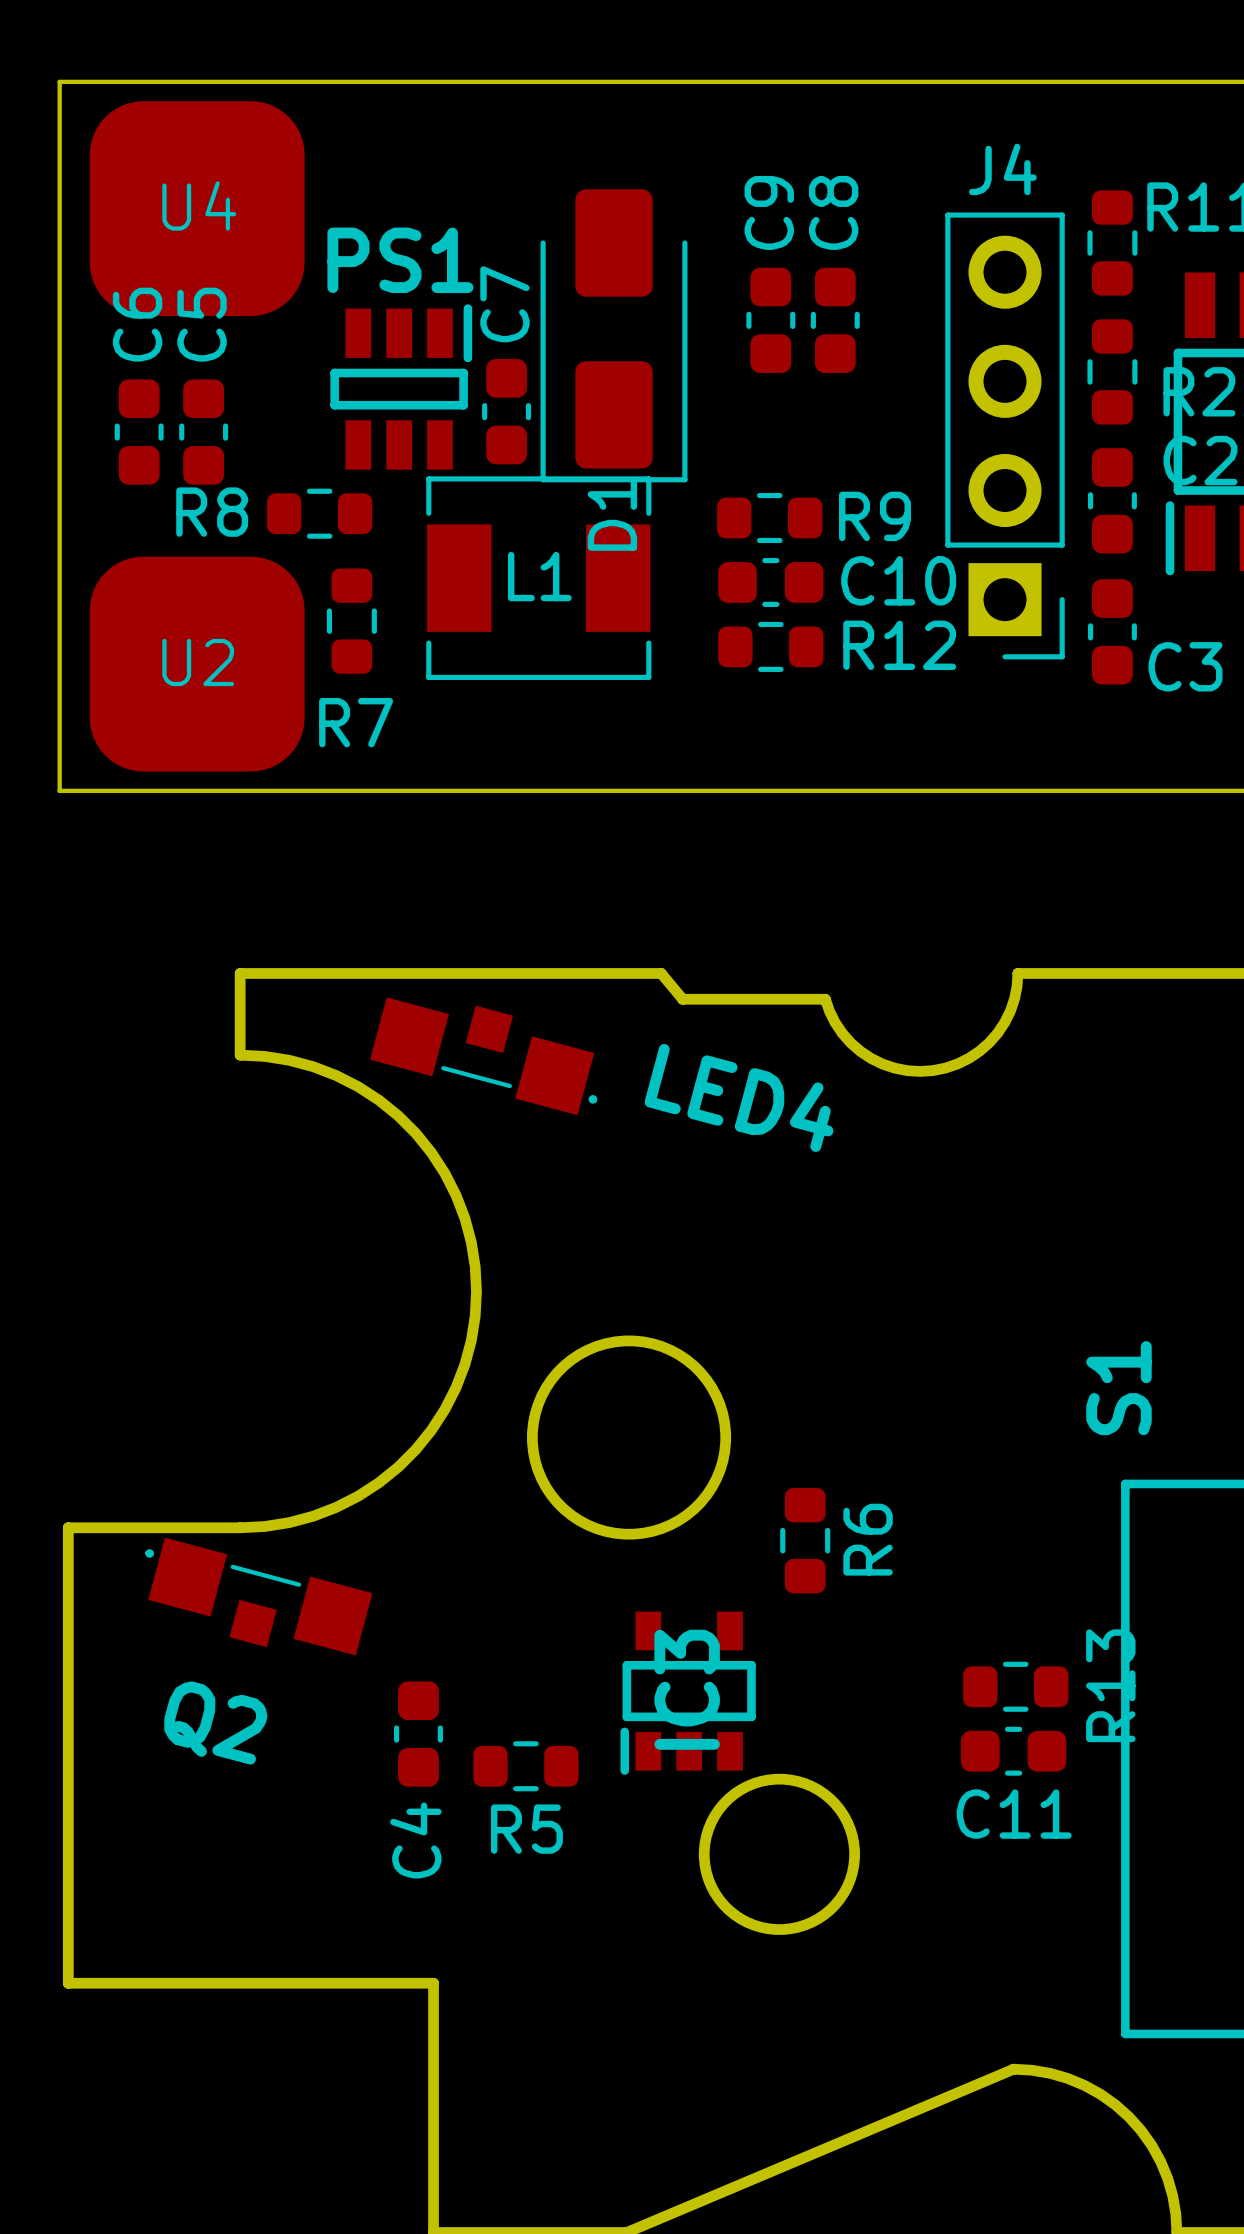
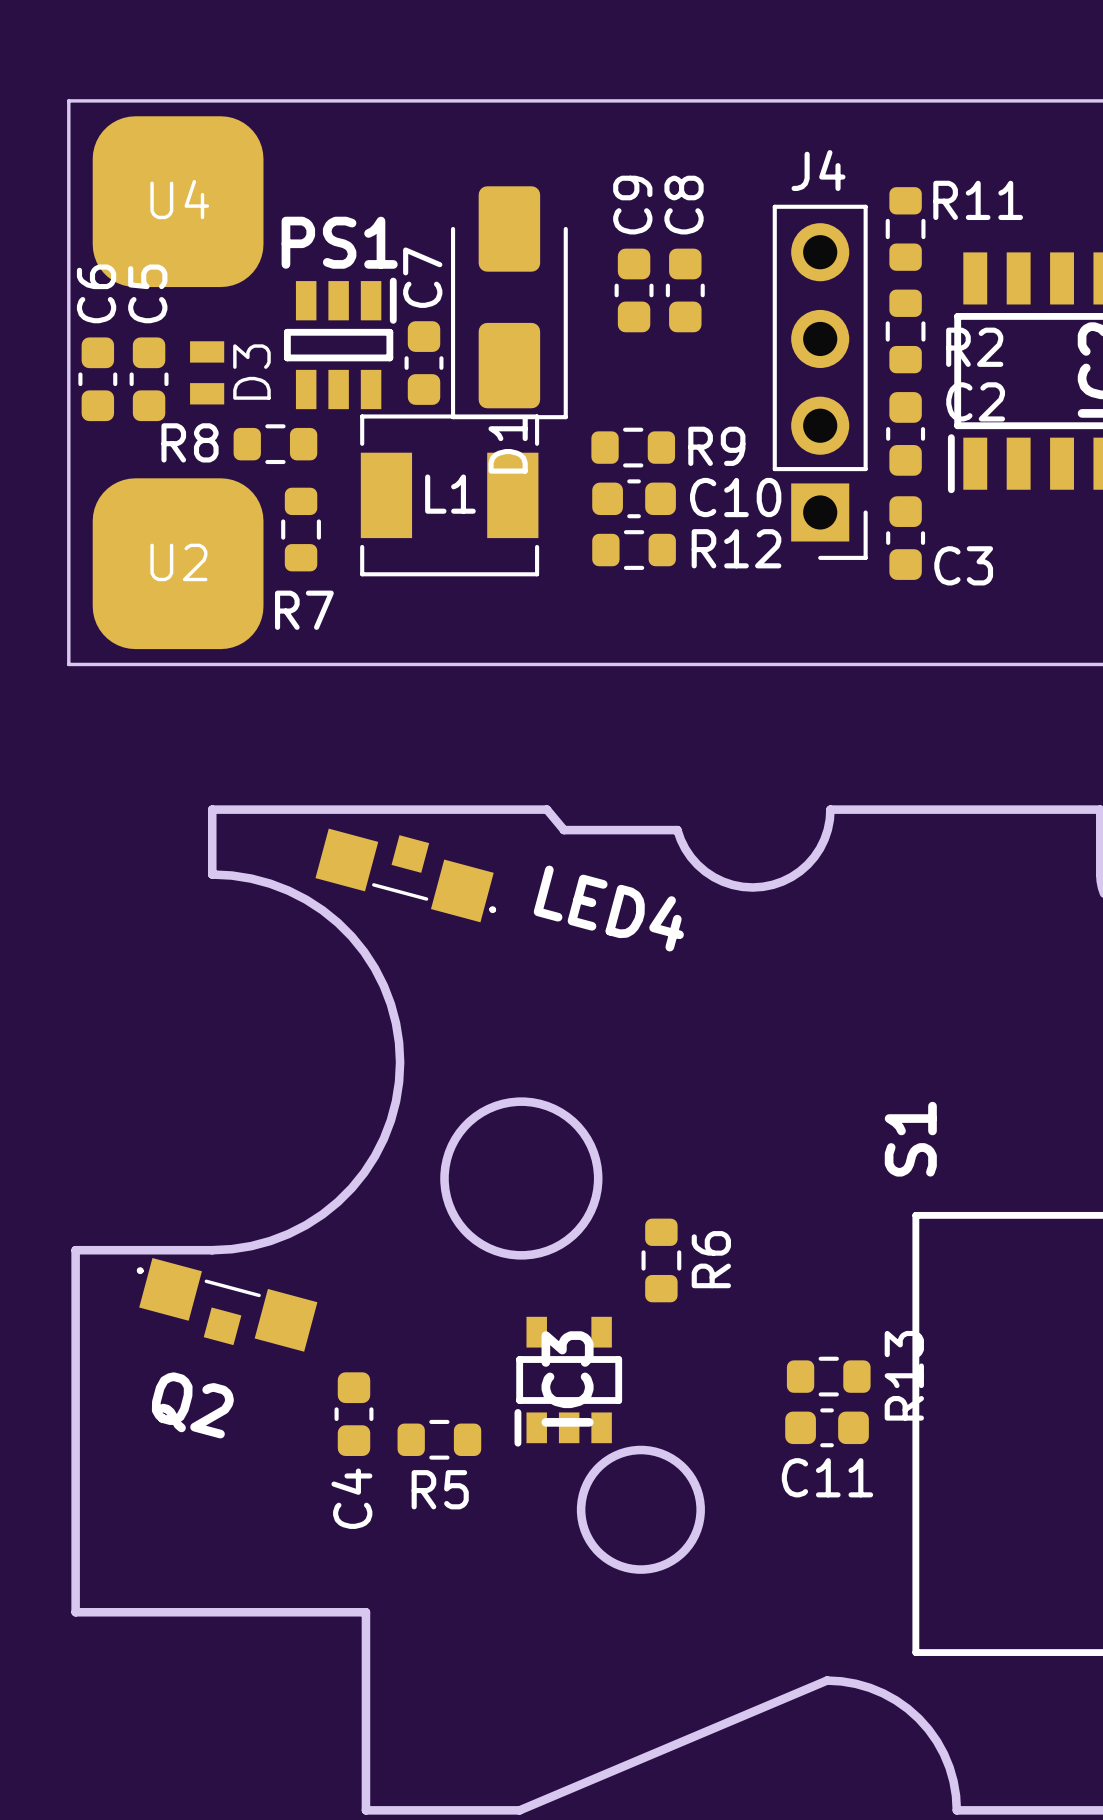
D3: none -> (207, 372)
C6 position: (139, 432) -> (97, 379)
C5 position: (203, 432) -> (149, 379)

